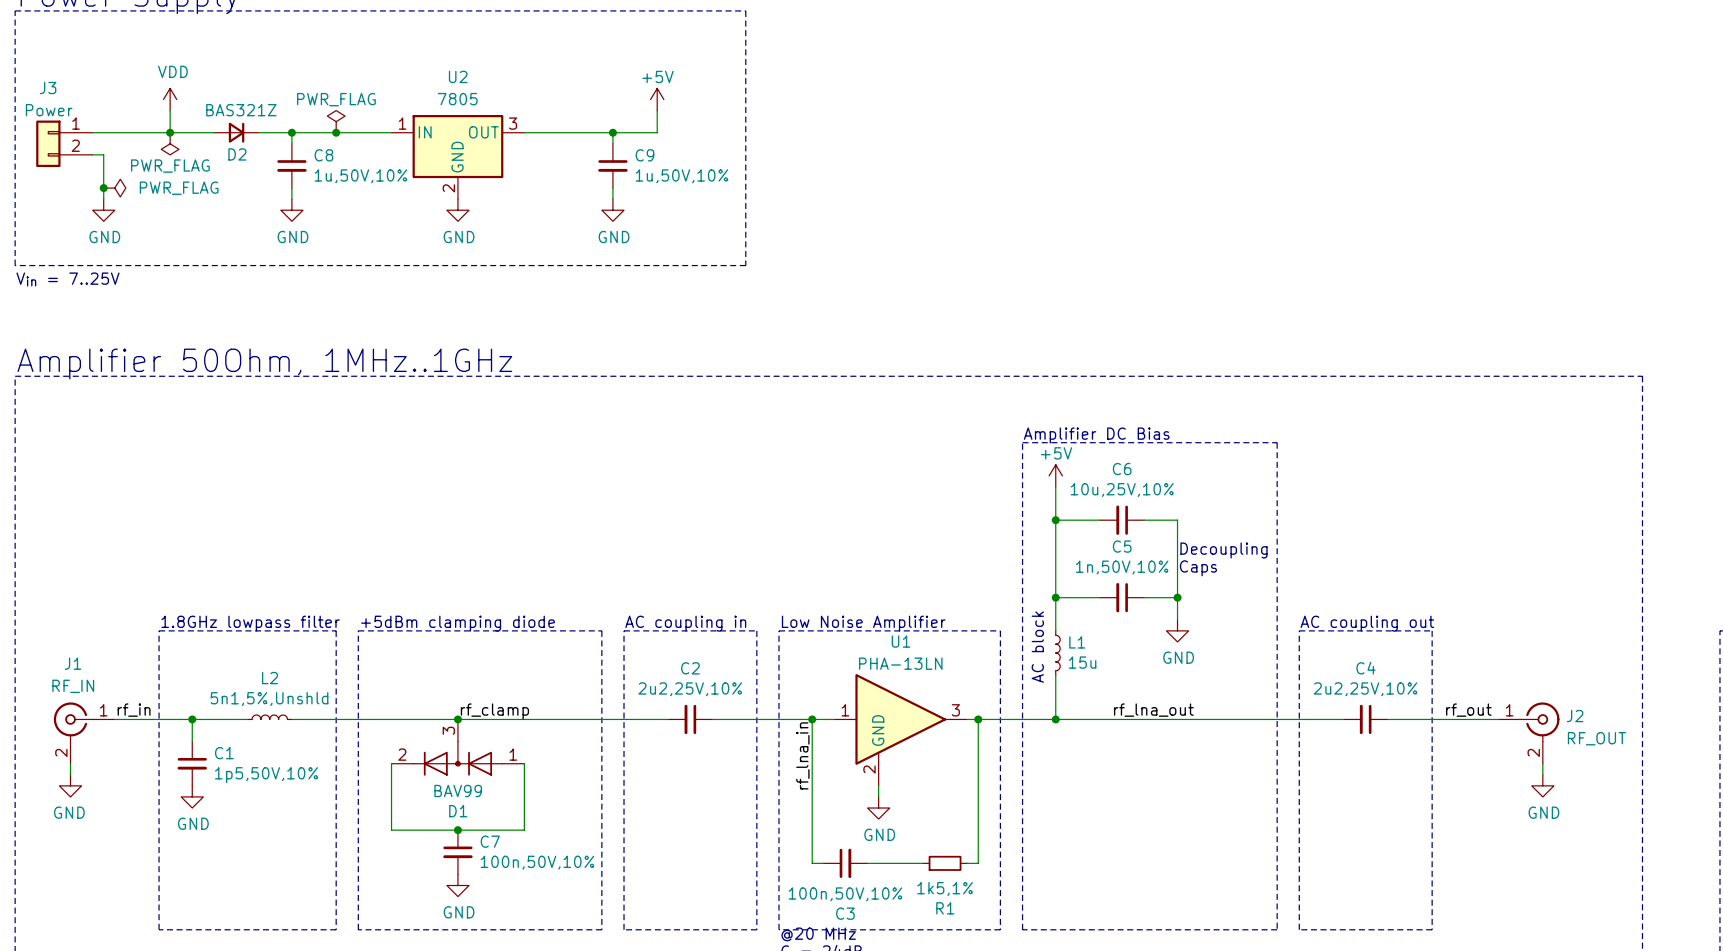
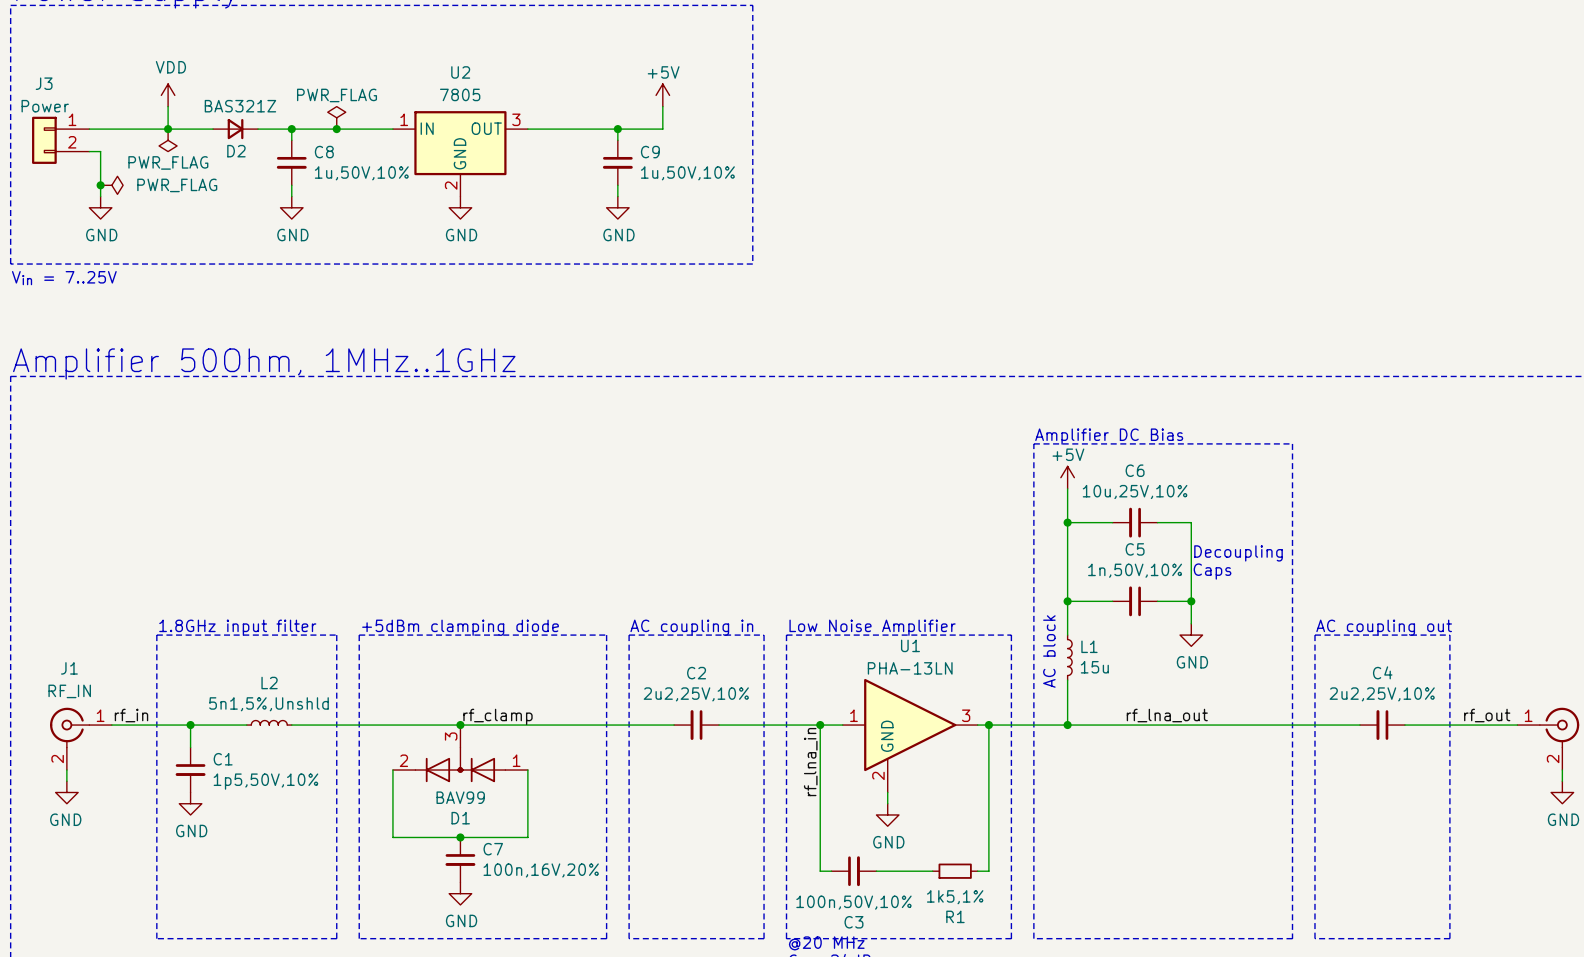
text: 1.8GHz lowpass filter (250, 623) -> 1.8GHz input filter (237, 627)
C7 value: 100n,50V,10% (537, 862) -> 100n,16V,20% (541, 870)

